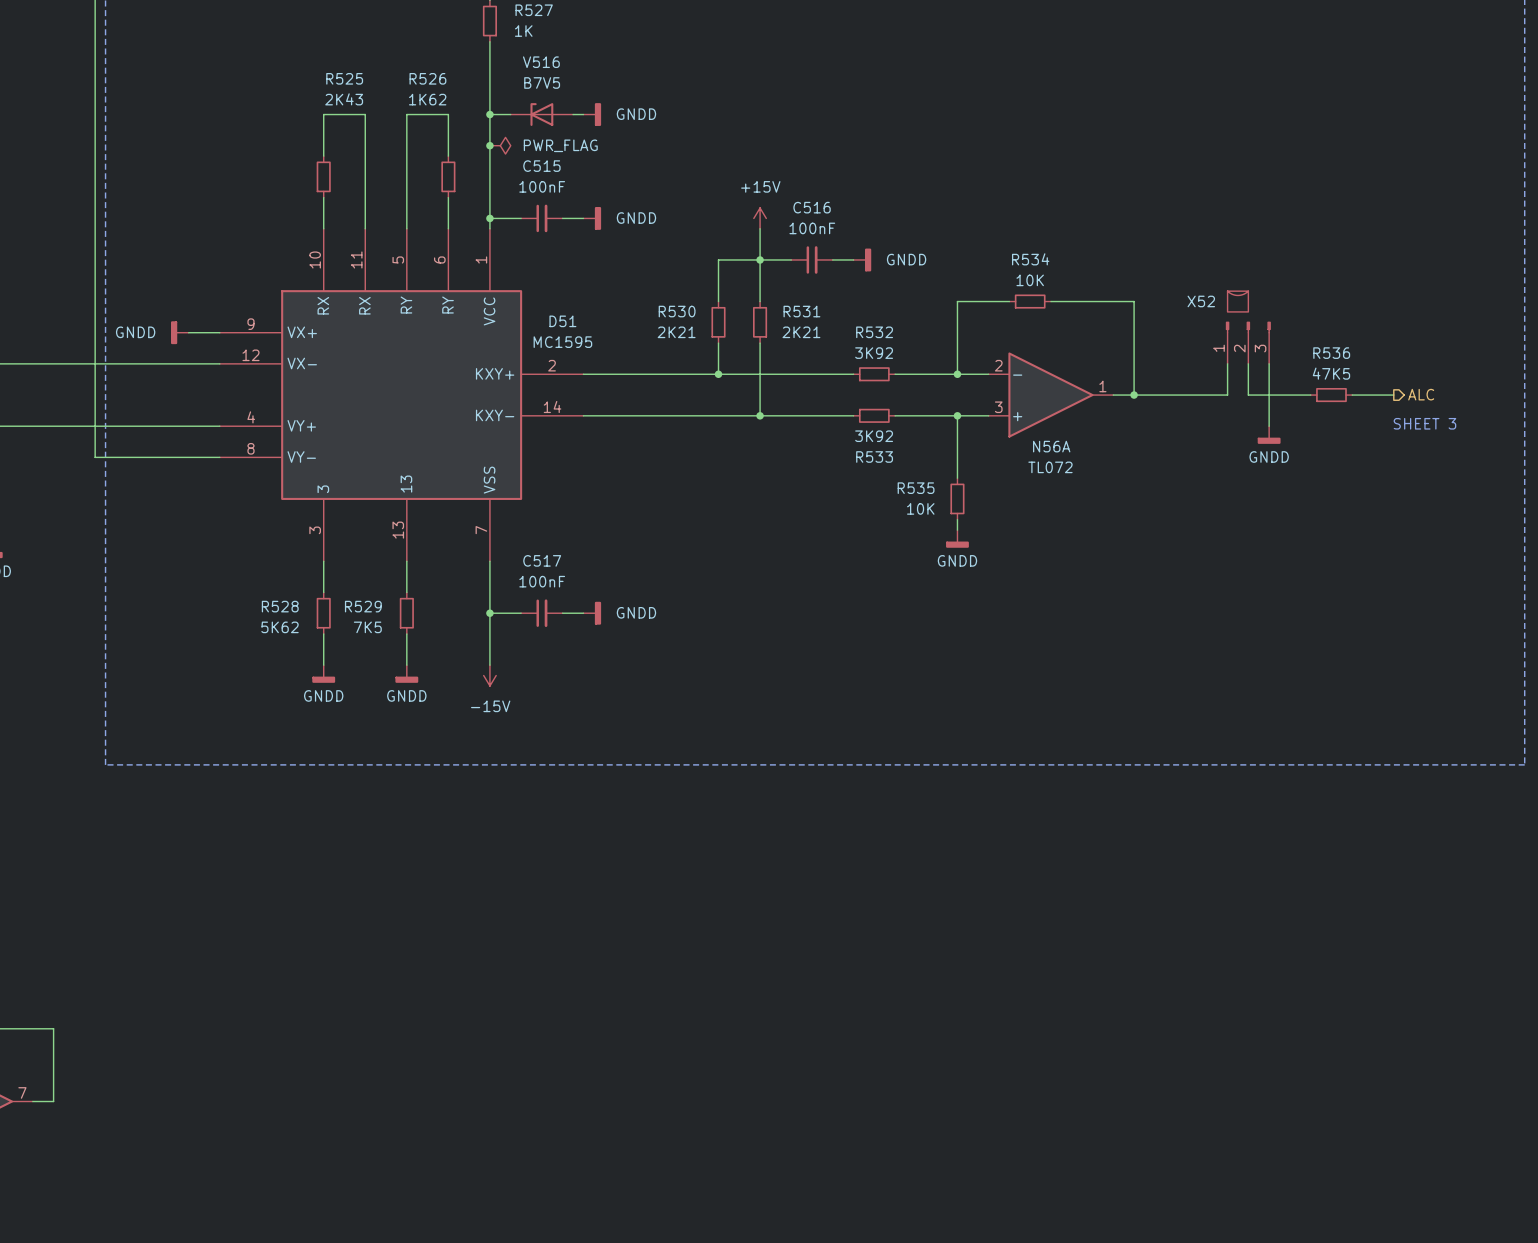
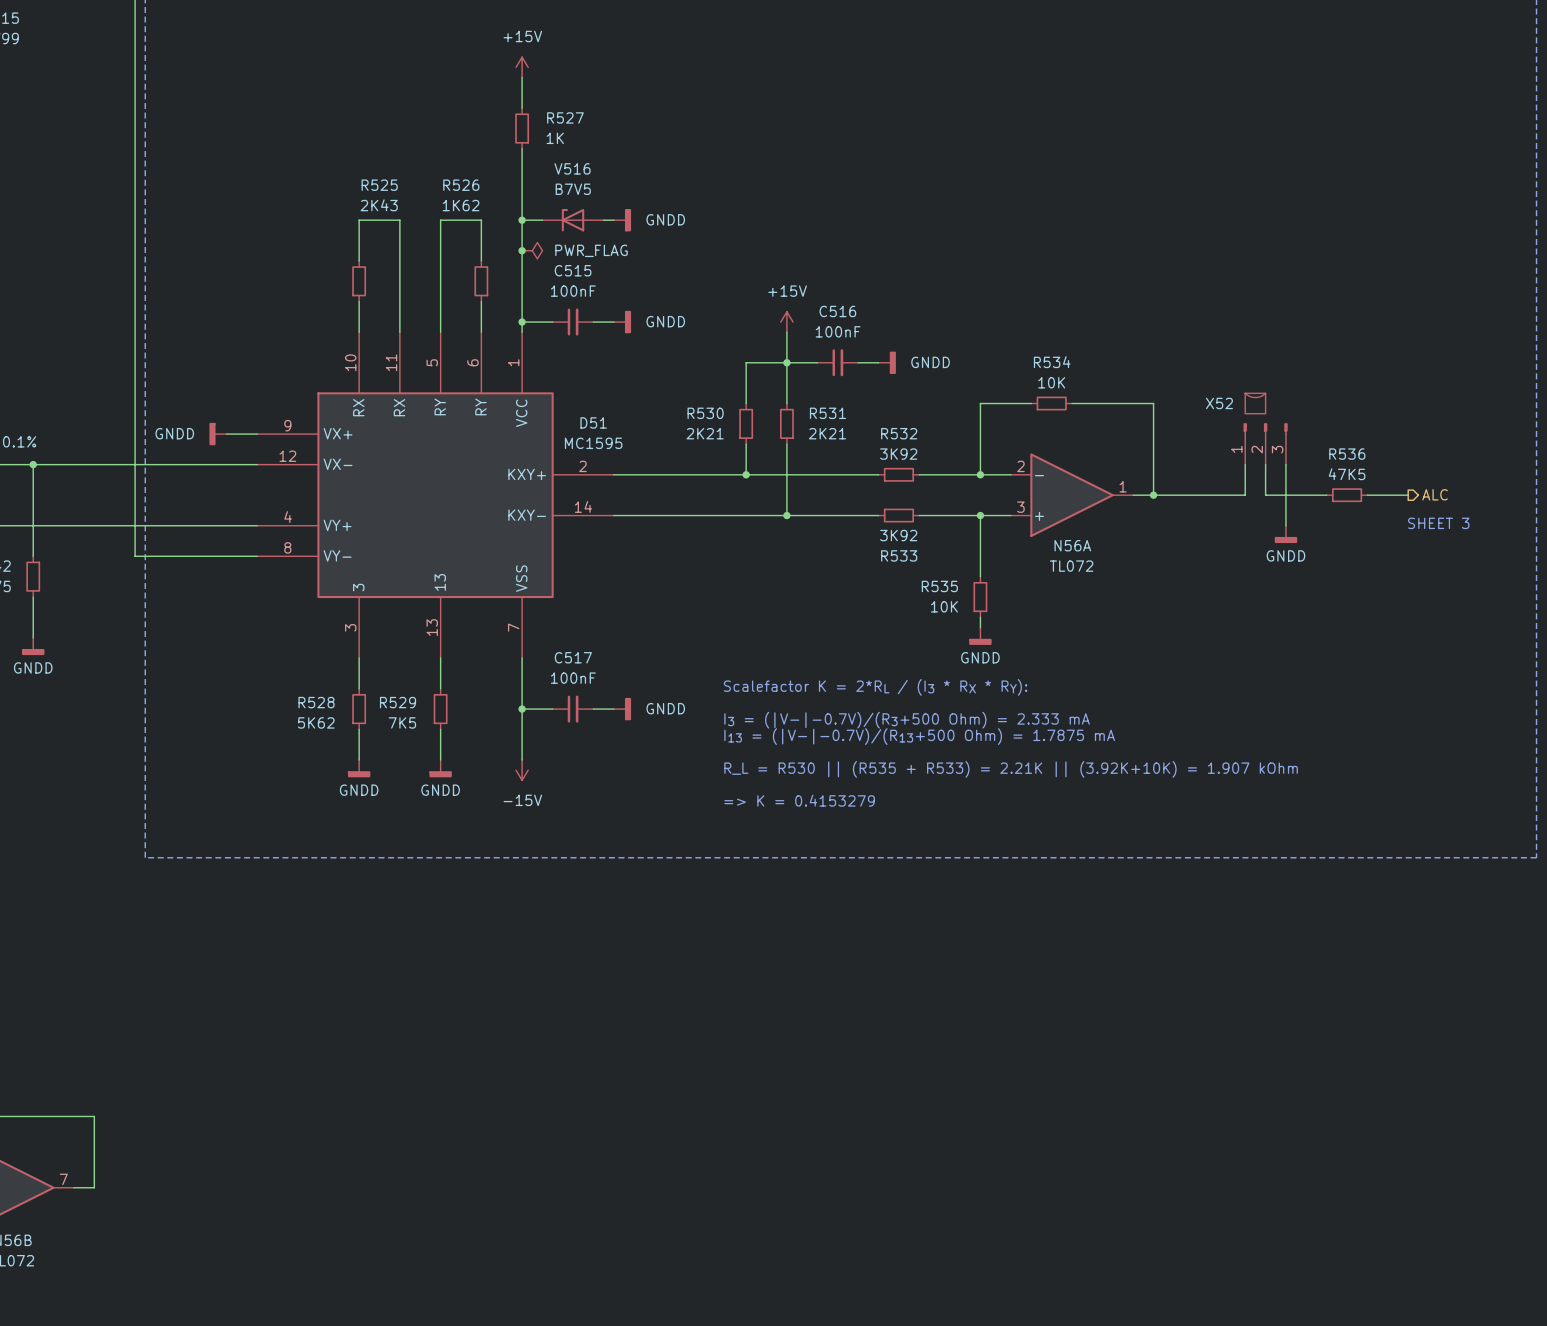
text: none -> Scalefactor K = 2*RL / (I3 * RX * RY): (875, 687)
text: none -> I3 = (|V-|-0.7V)/(R3+500 Ohm) = 2.333 mA (907, 720)
text: none -> I13 = (|V-|-0.7V)/(R13+500 Ohm) = 1.7875 mA (919, 736)
text: none -> R_L = R530 || (R535 + R533) = 2.21K || (3.92K+10K) = 1.907 kOhm (1011, 769)
text: none -> => K = 0.4153279 (799, 800)

